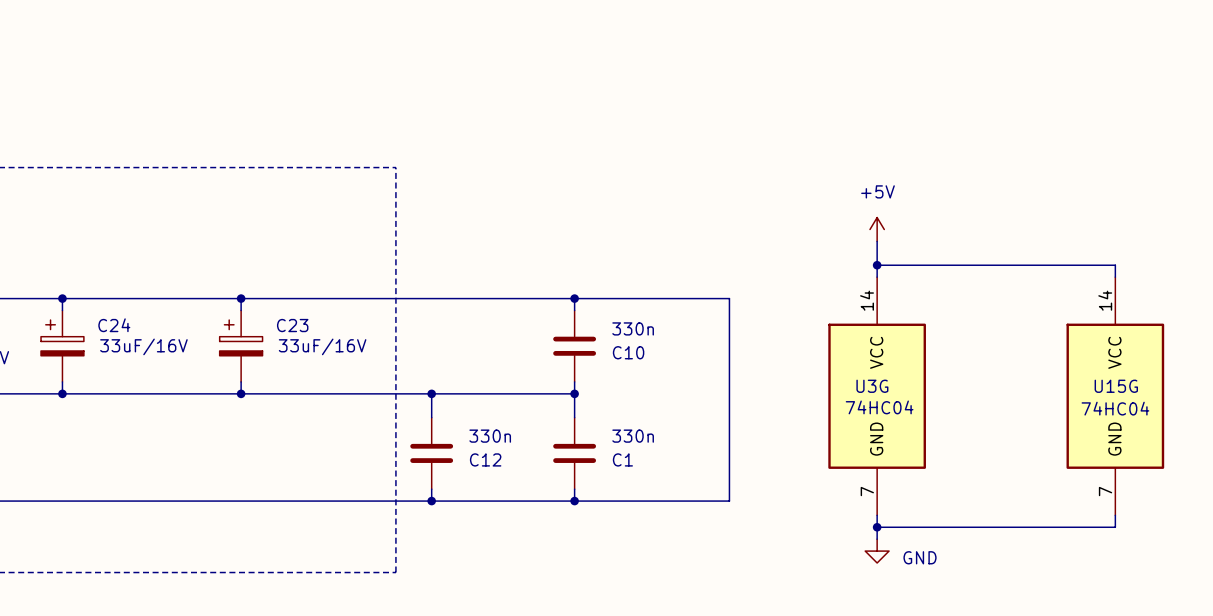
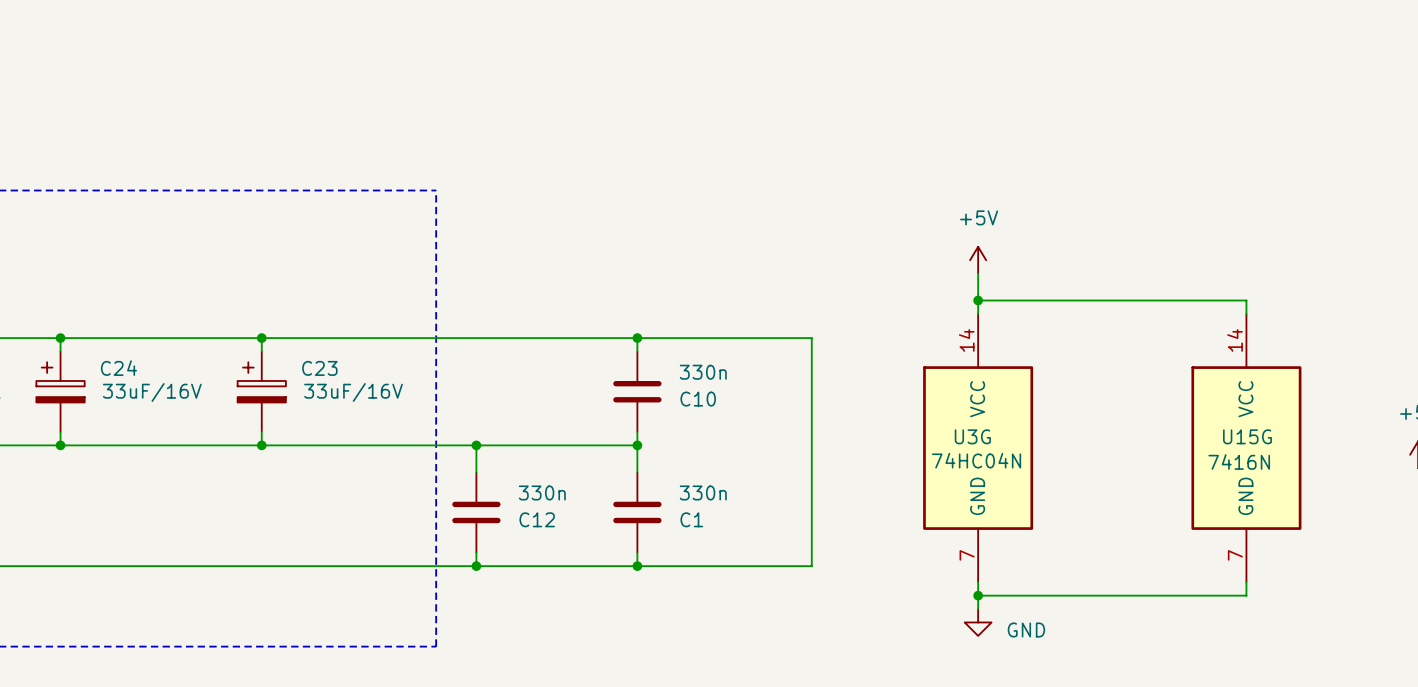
U3G value: 74HC04 (879, 407) -> 74HC04N (976, 460)
U15G value: 74HC04 (1115, 408) -> 7416N (1239, 462)

